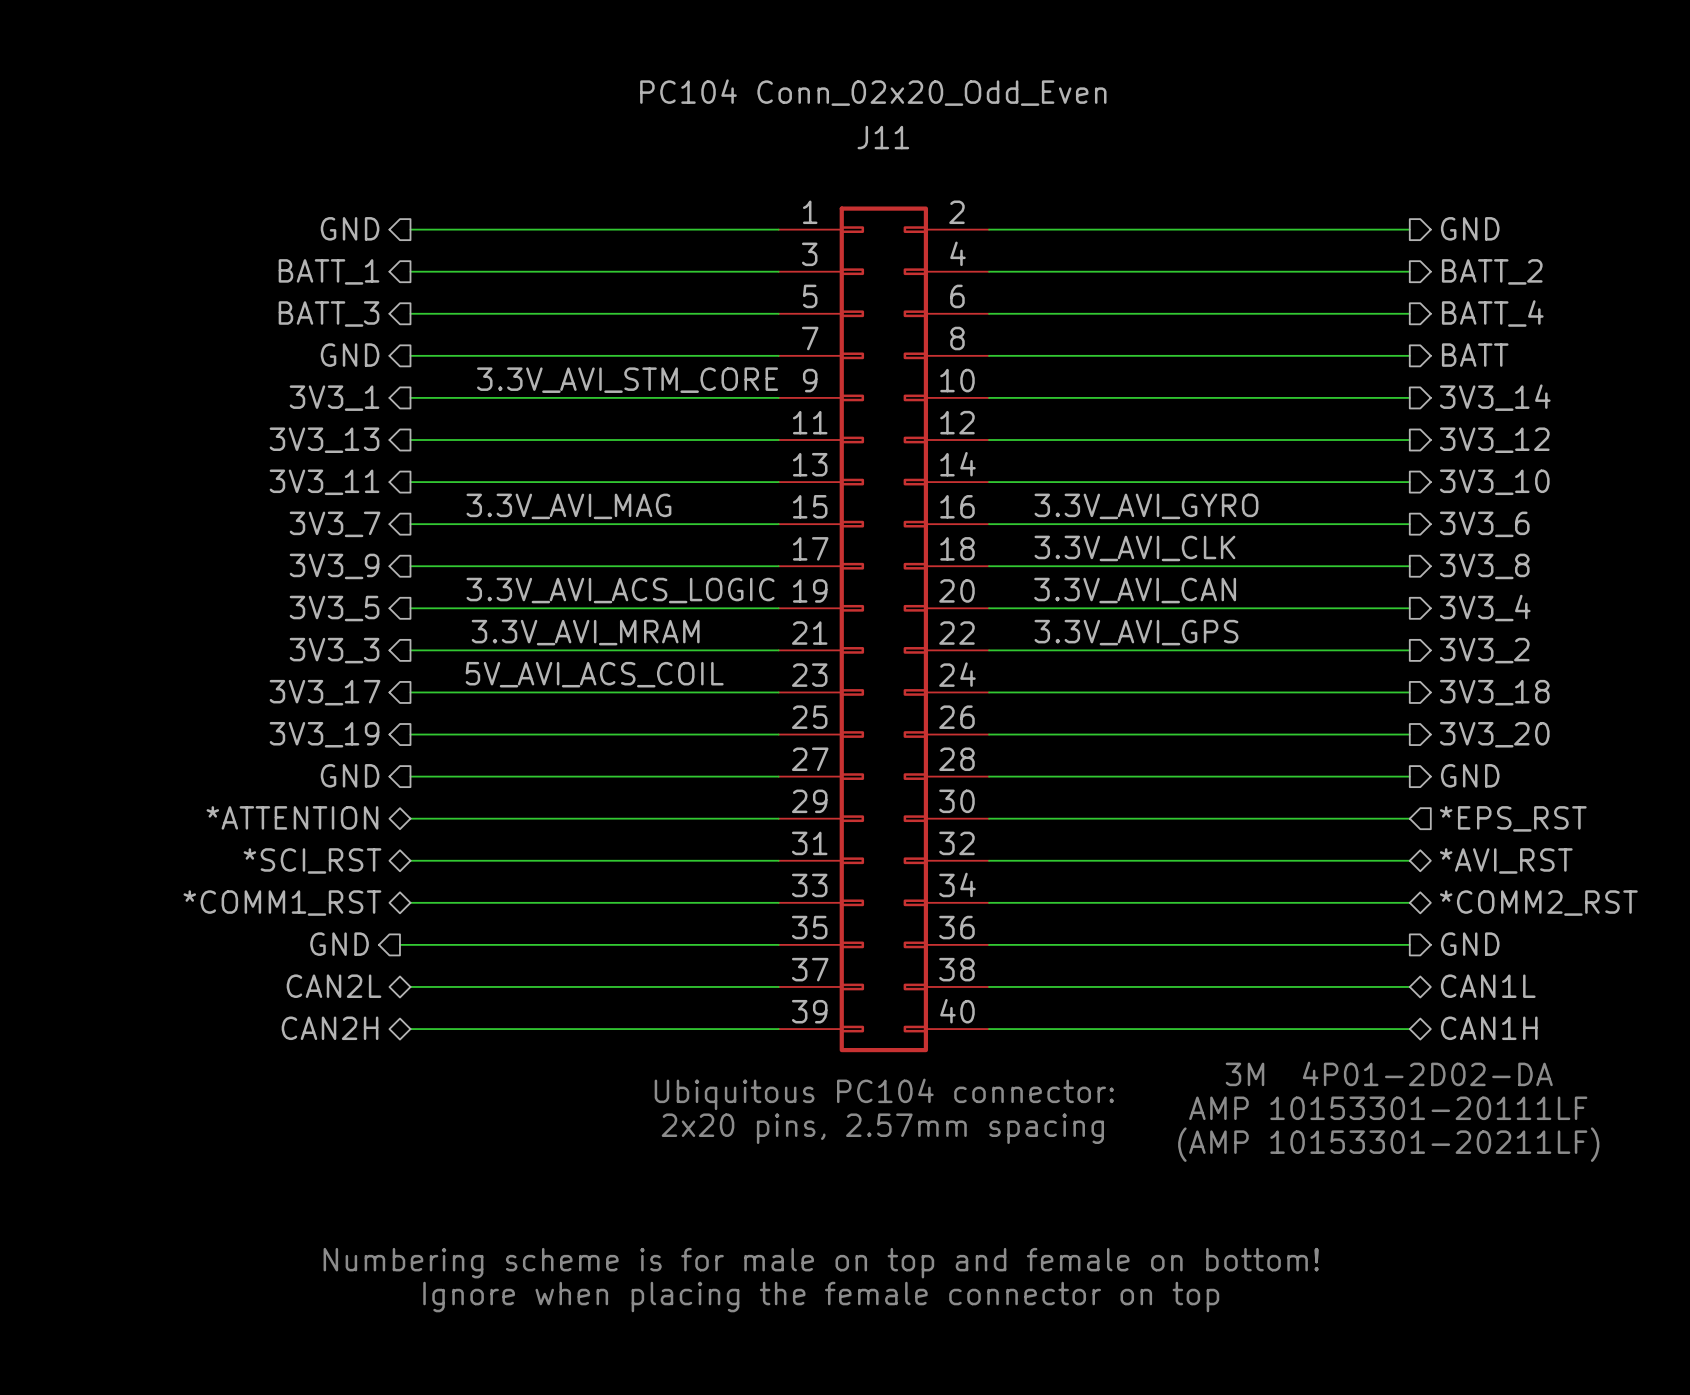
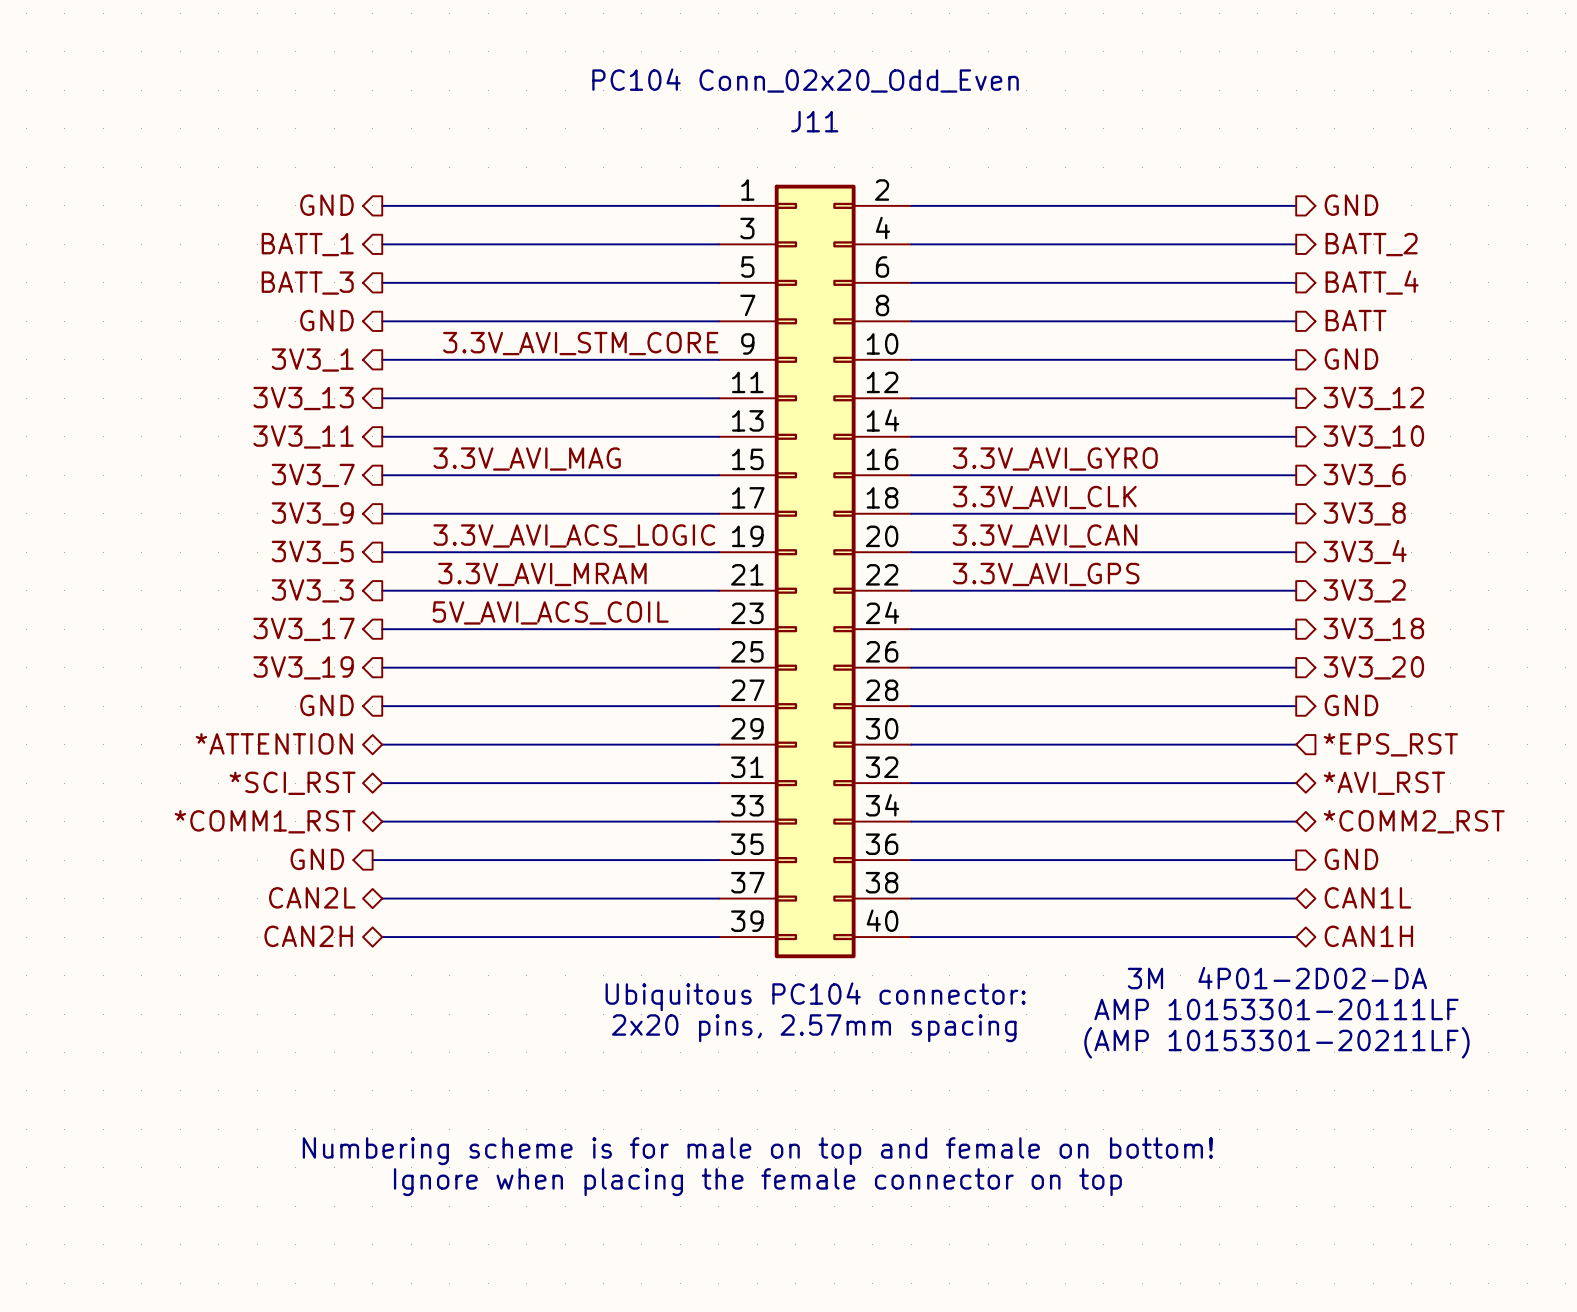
hierarchical label: 3V3_14 (1495, 397) -> GND (1351, 359)

